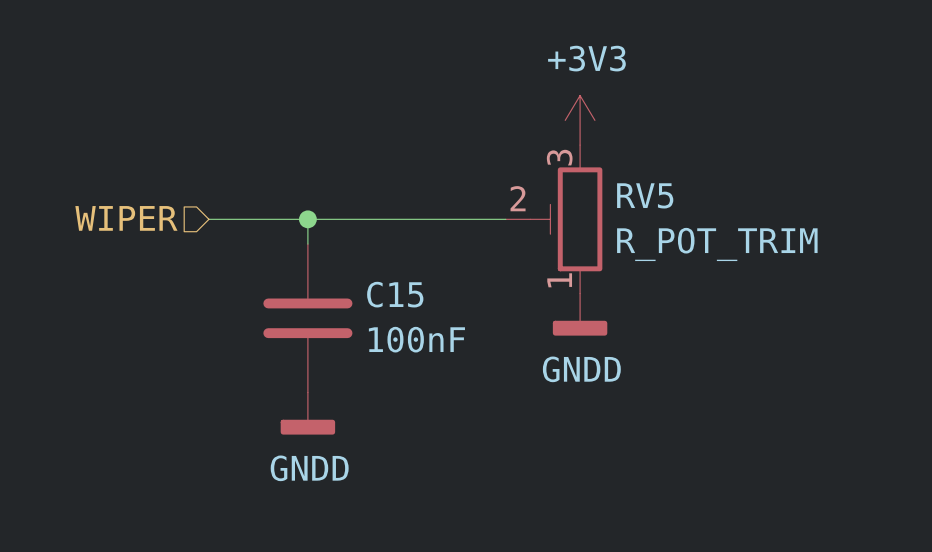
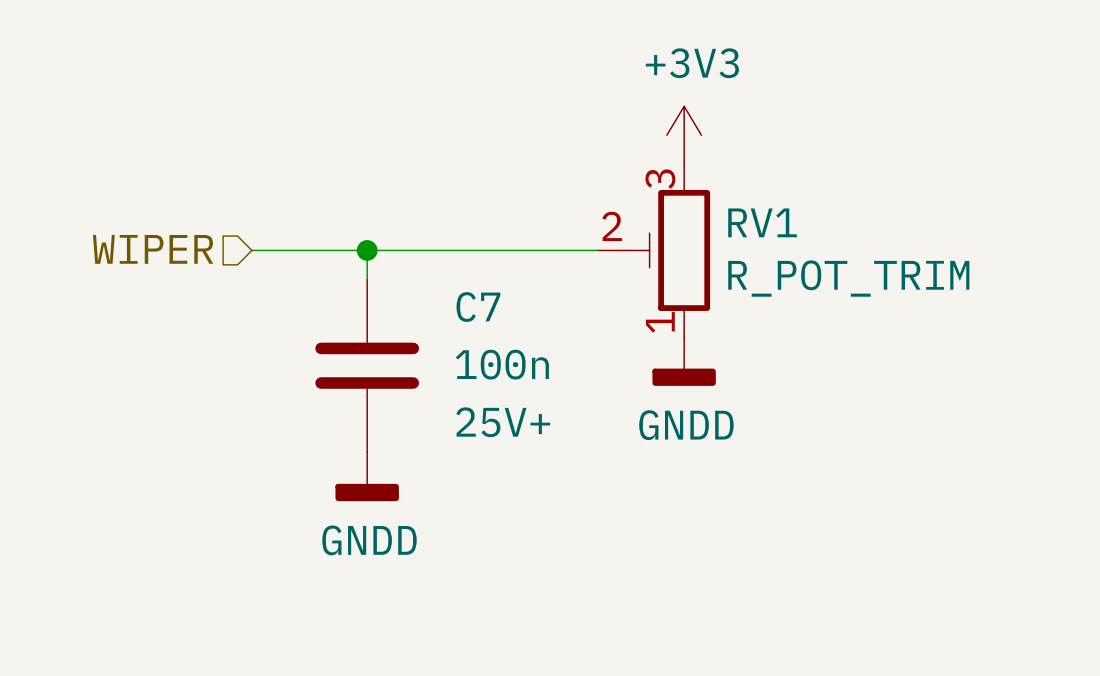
RV5 name: RV5 (645, 195) -> RV1 (762, 222)
C15 name: C15 (395, 294) -> C7 (478, 307)
C15 text: none -> 100n (502, 364)
C15 value: 100nF (416, 339) -> none
C15 text: none -> 25V+ (503, 422)

